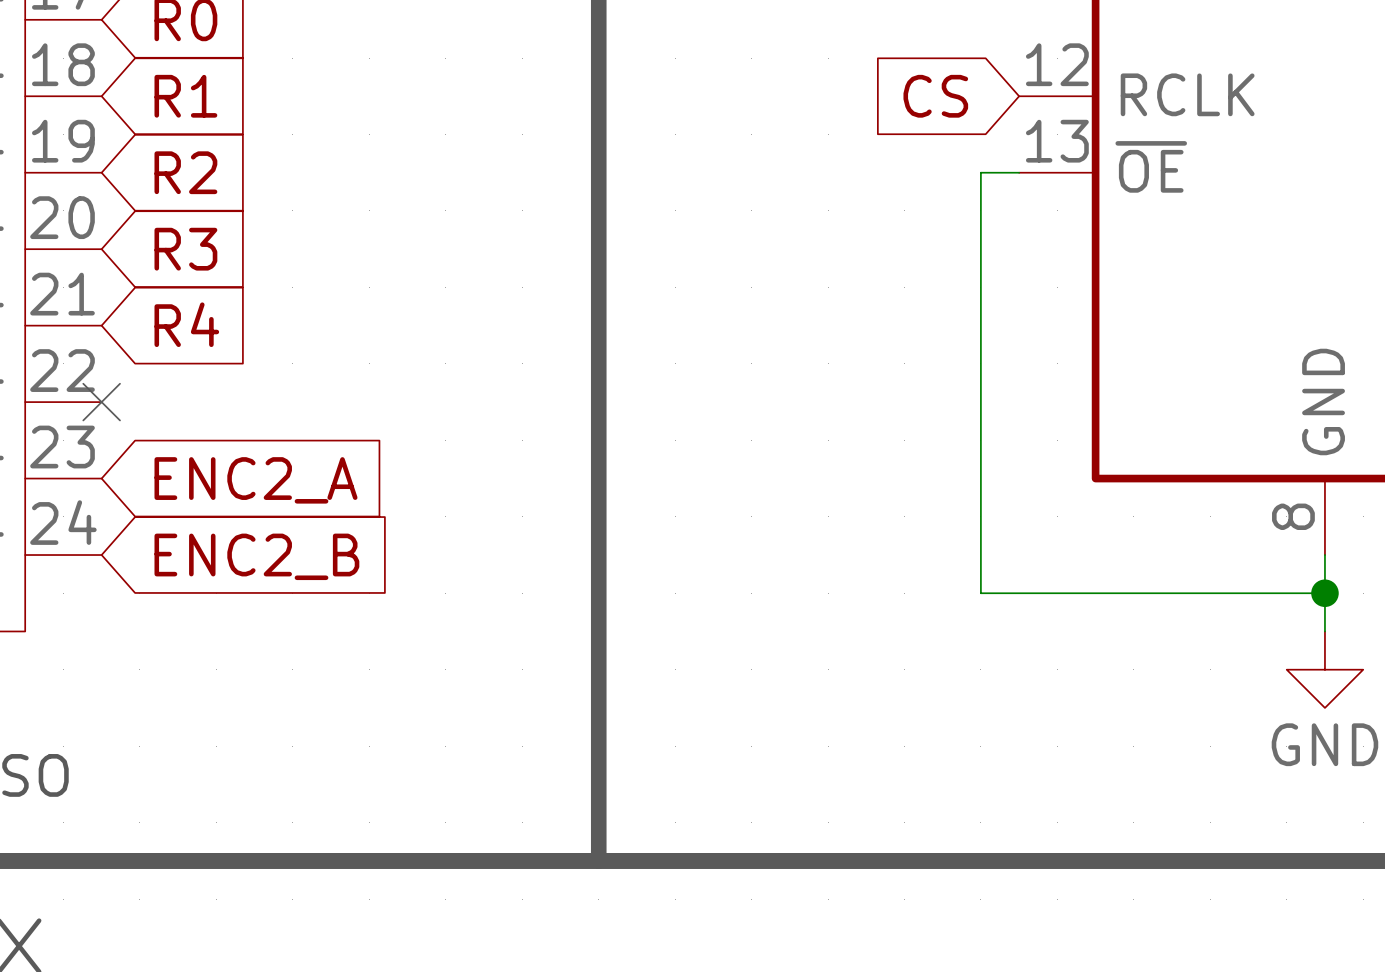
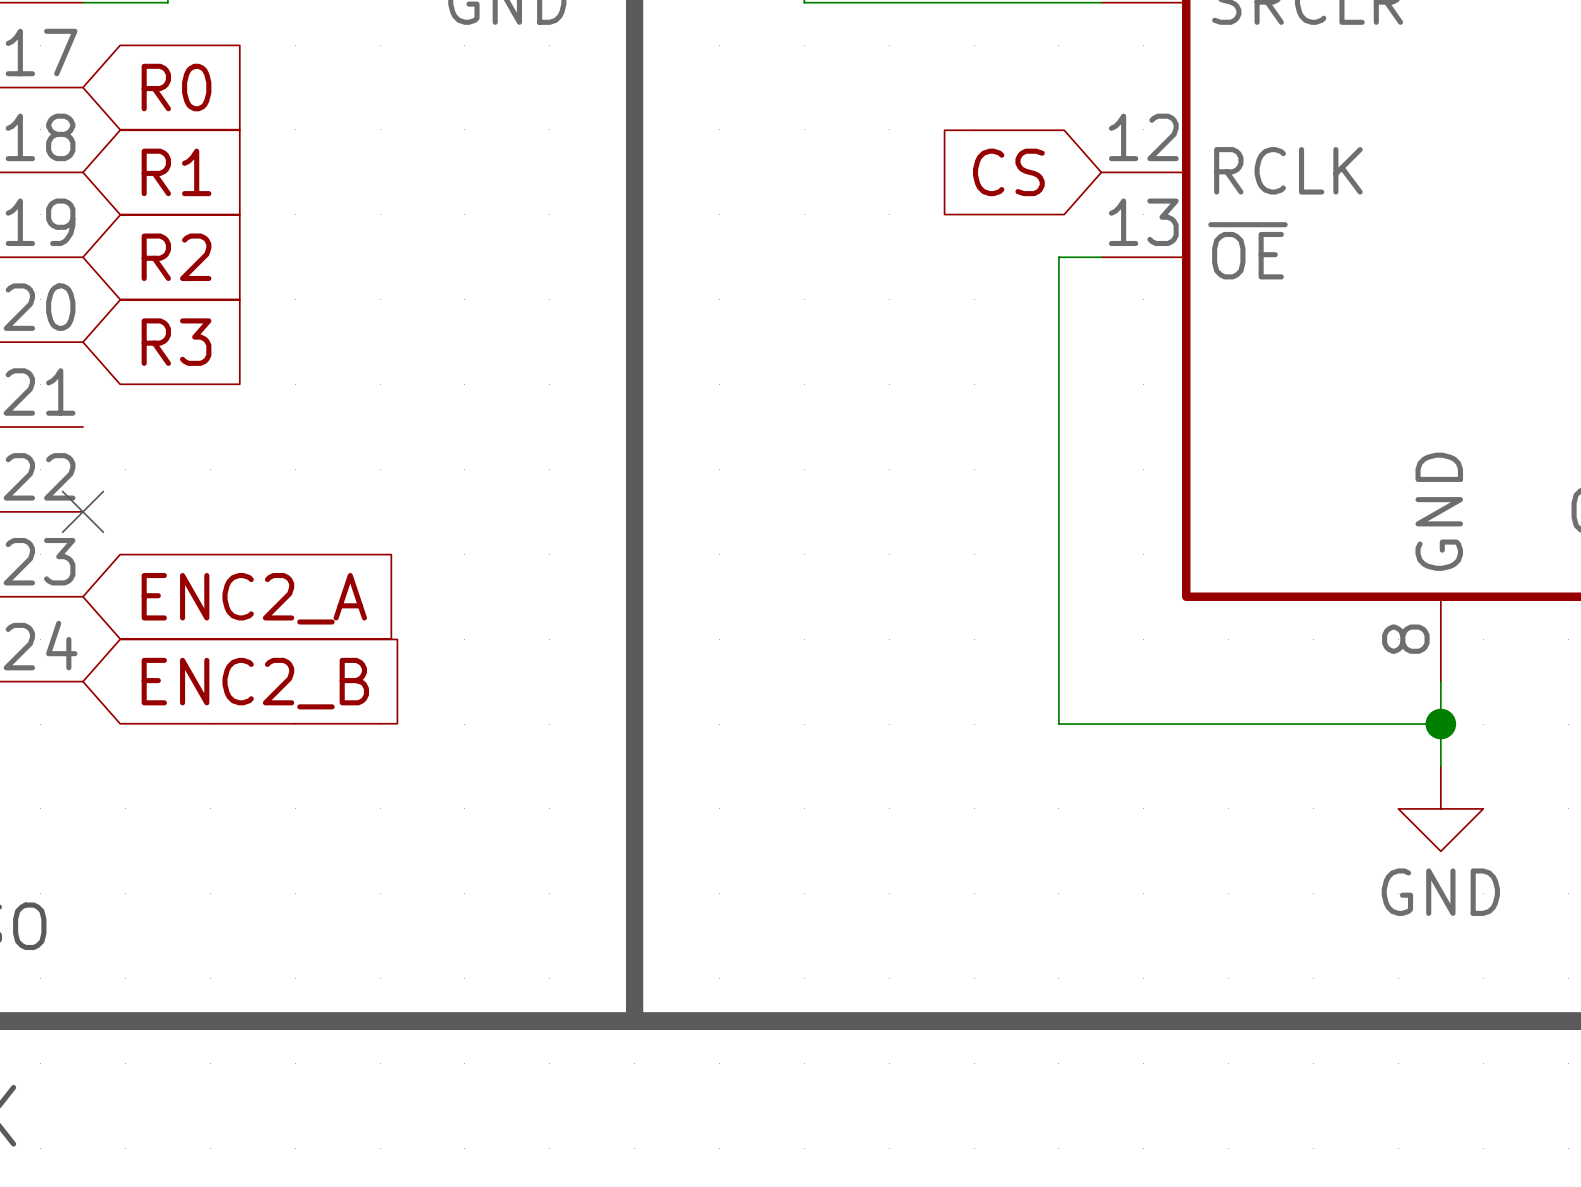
global label: R4 (186, 324) -> none

